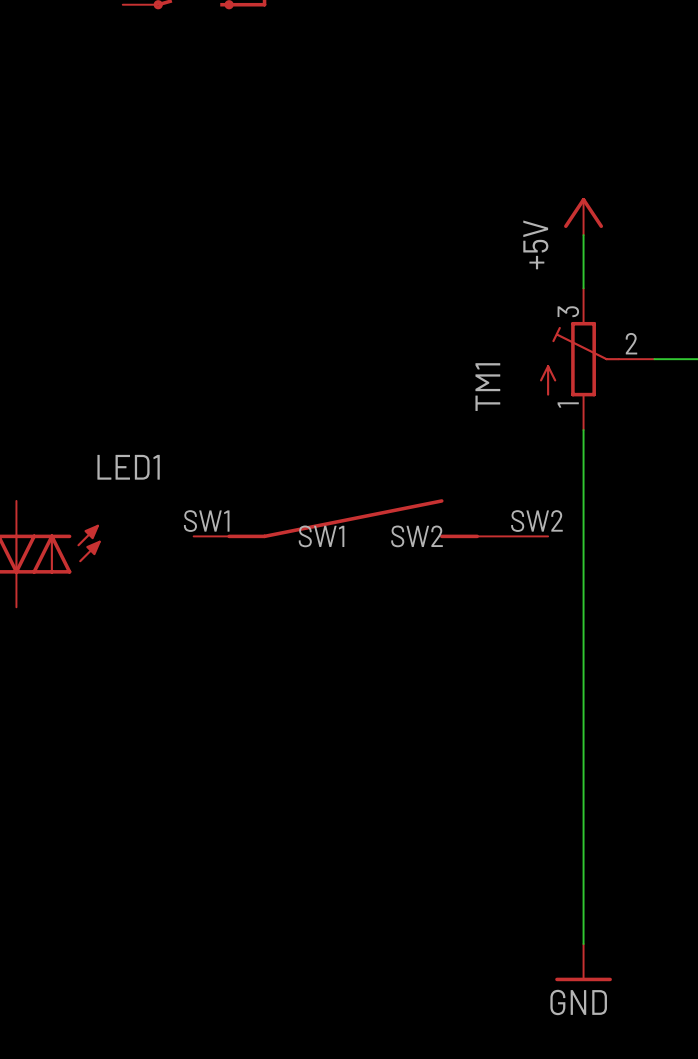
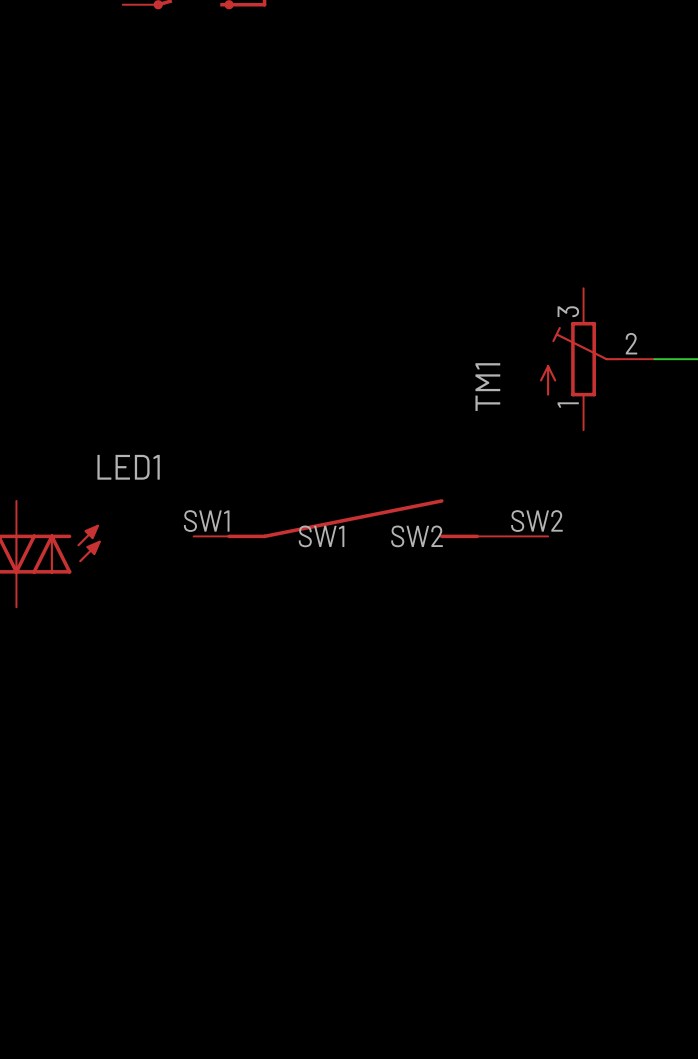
power symbol: +5V (583, 216) -> none
wire: (583, 235) (583, 288) -> none
wire: (583, 430) (583, 944) -> none
power symbol: GND (583, 962) -> none

